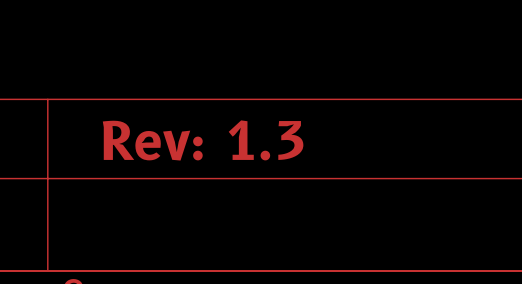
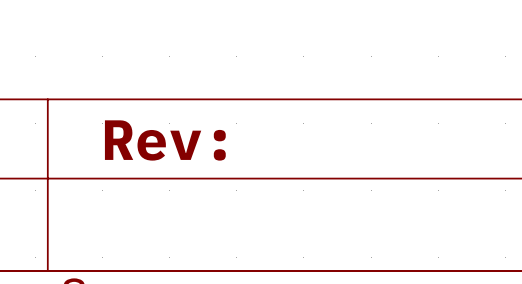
title block: Rev: 1.3 (203, 140) -> Rev: (165, 140)

